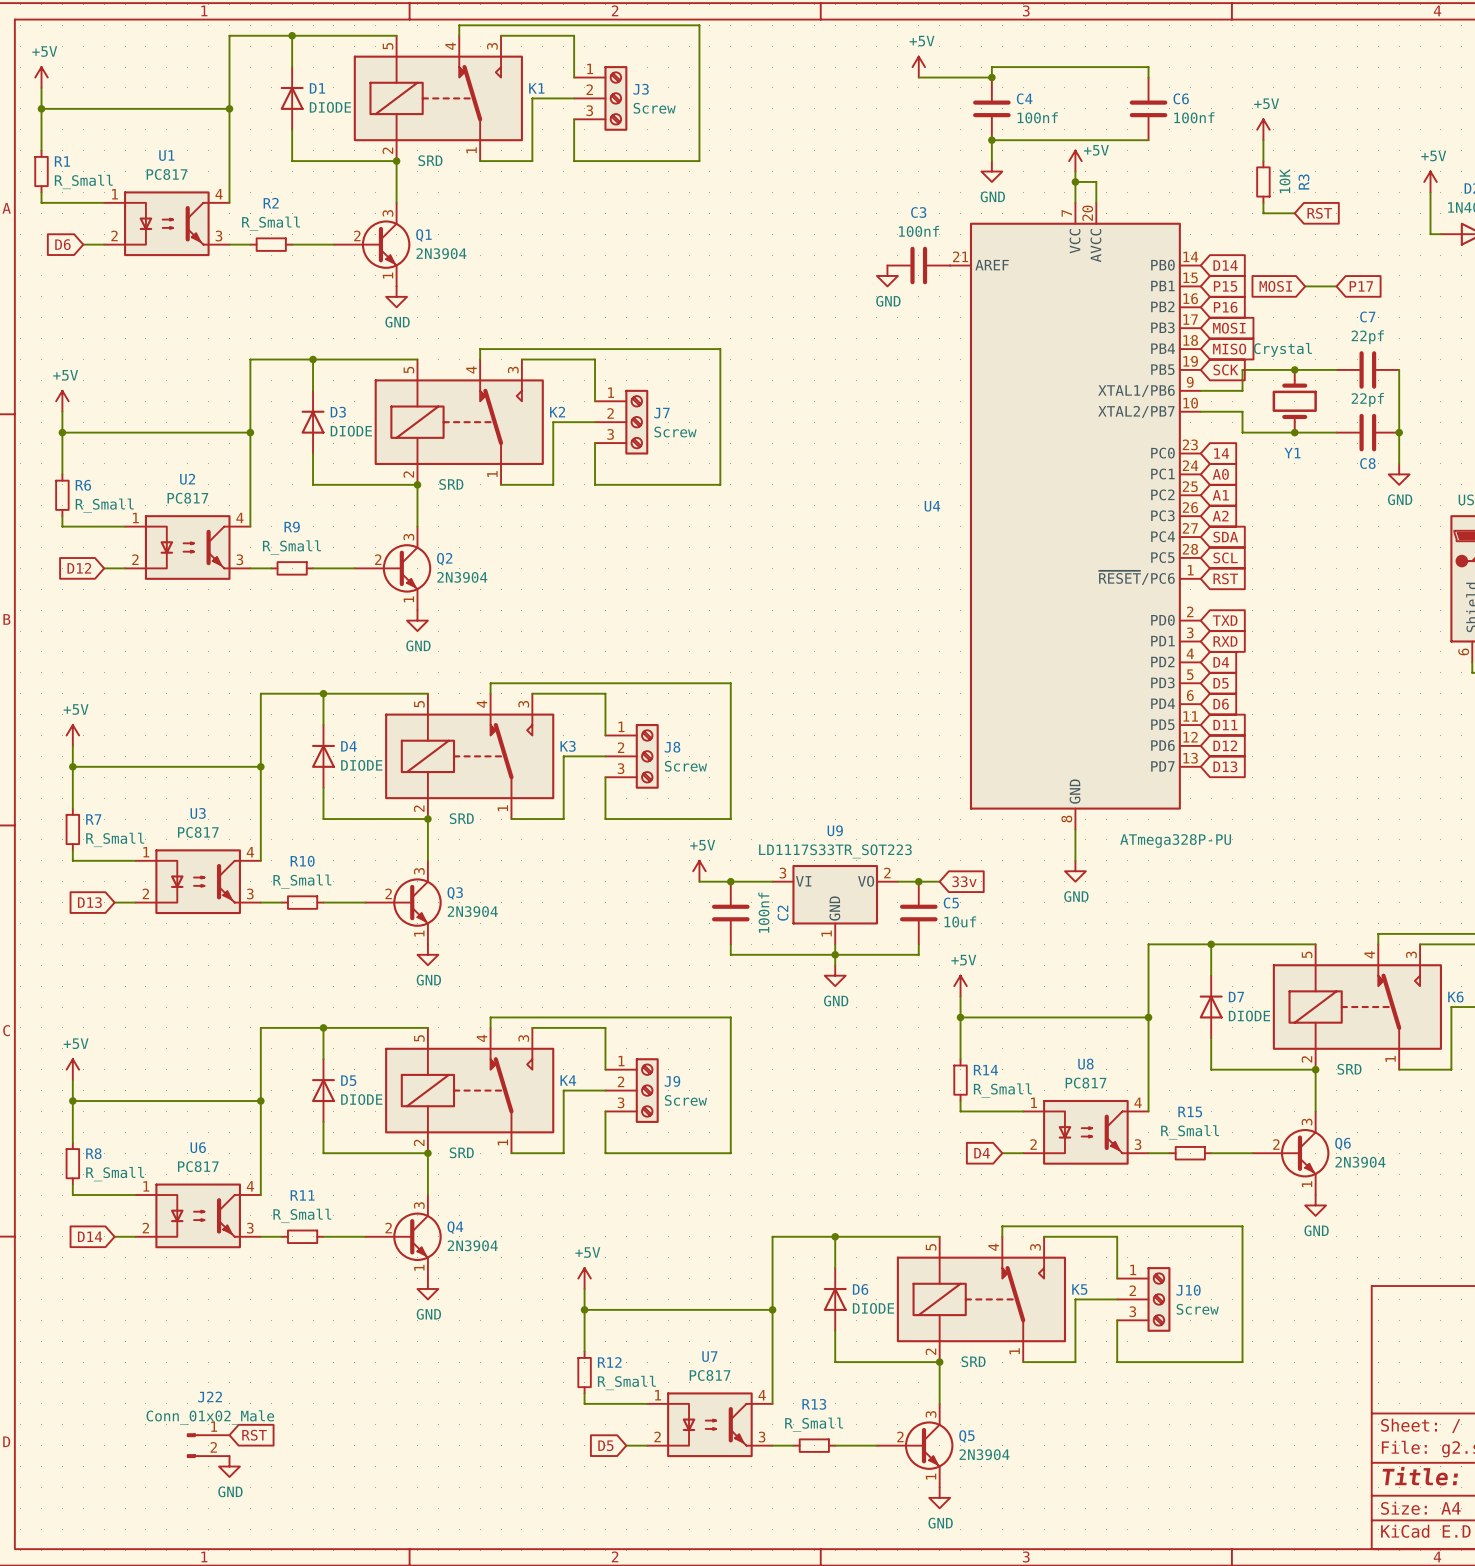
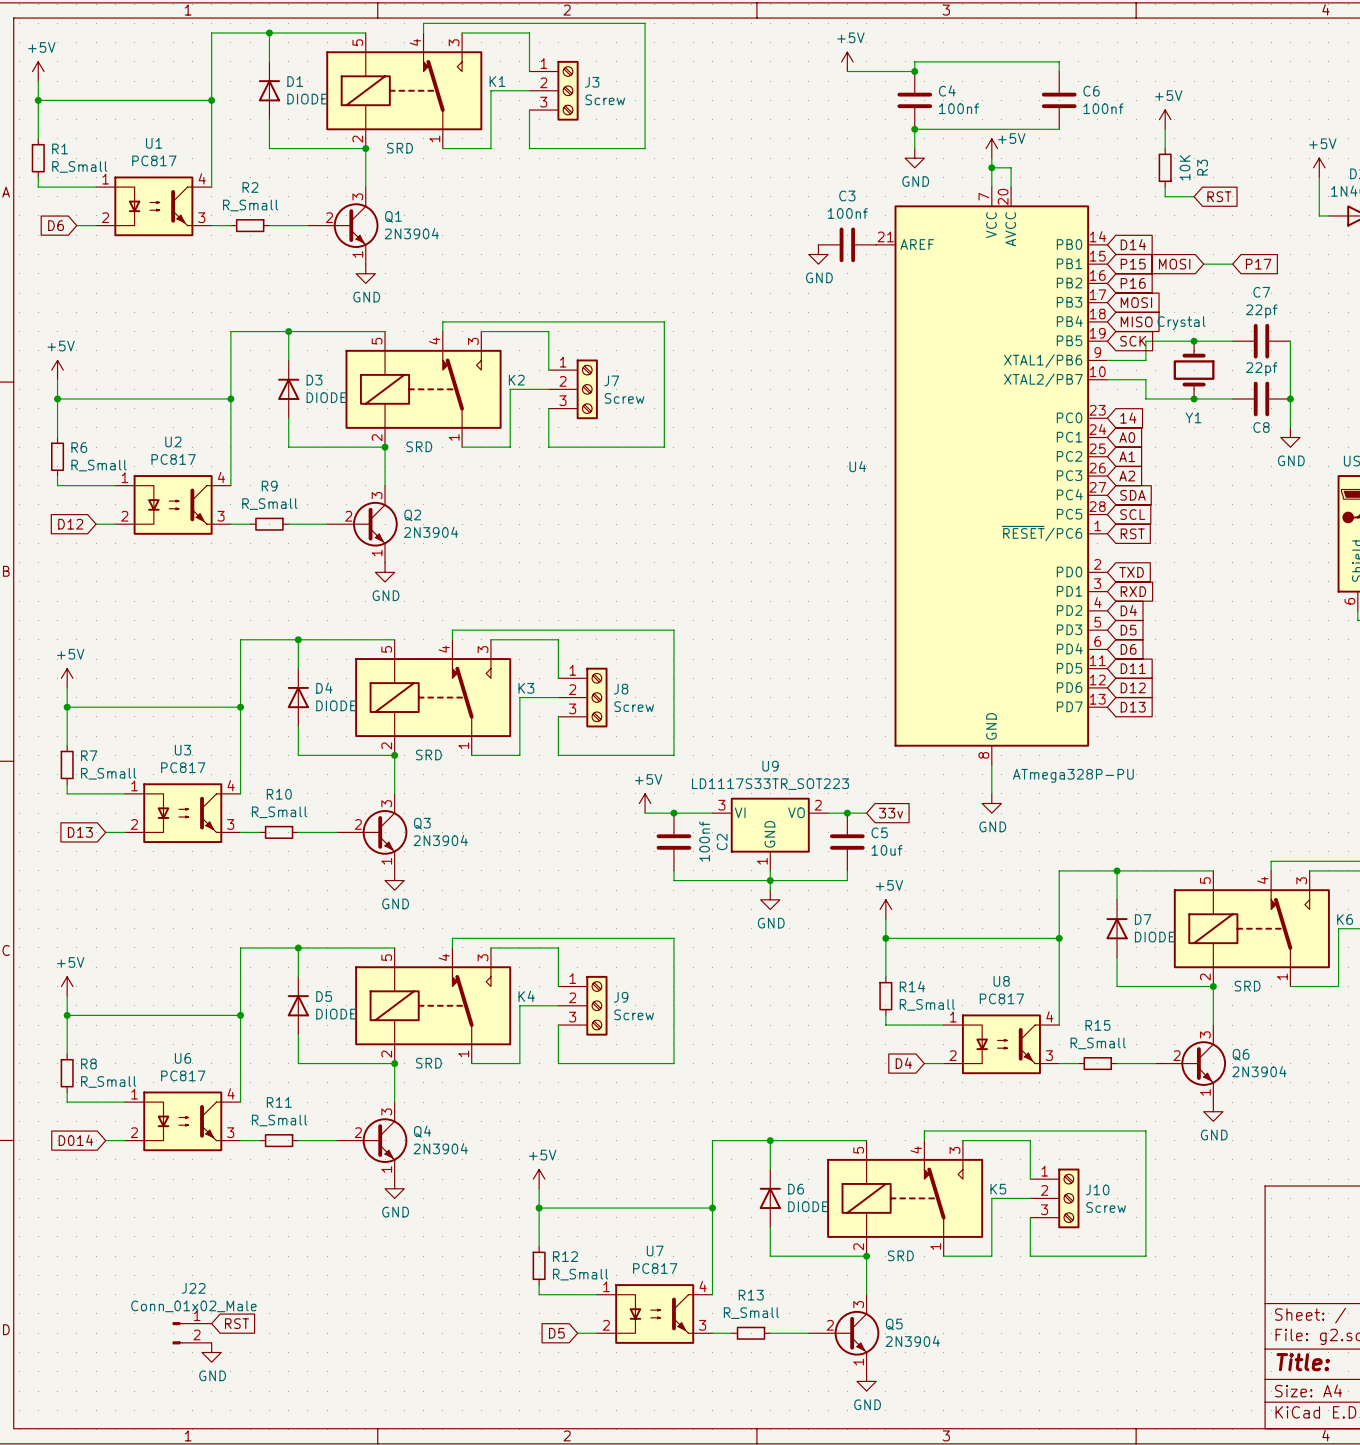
global label: D14 (90, 1236) -> D014 (75, 1140)

